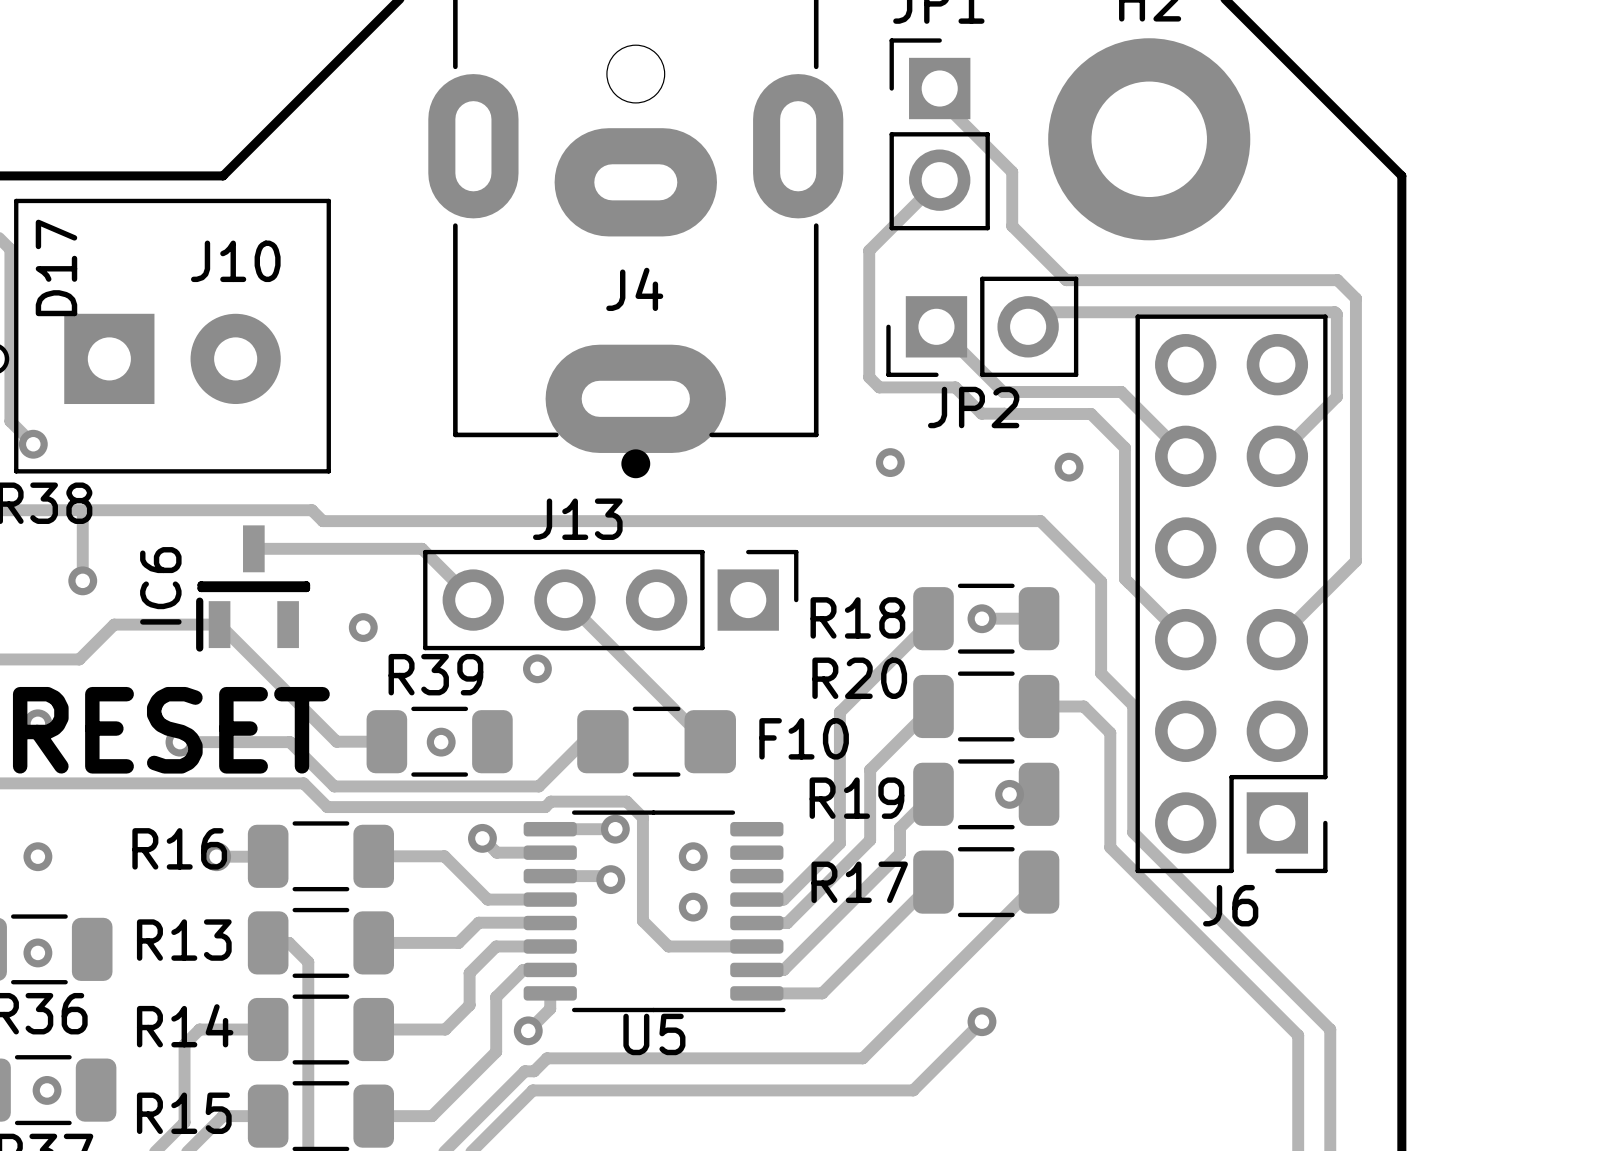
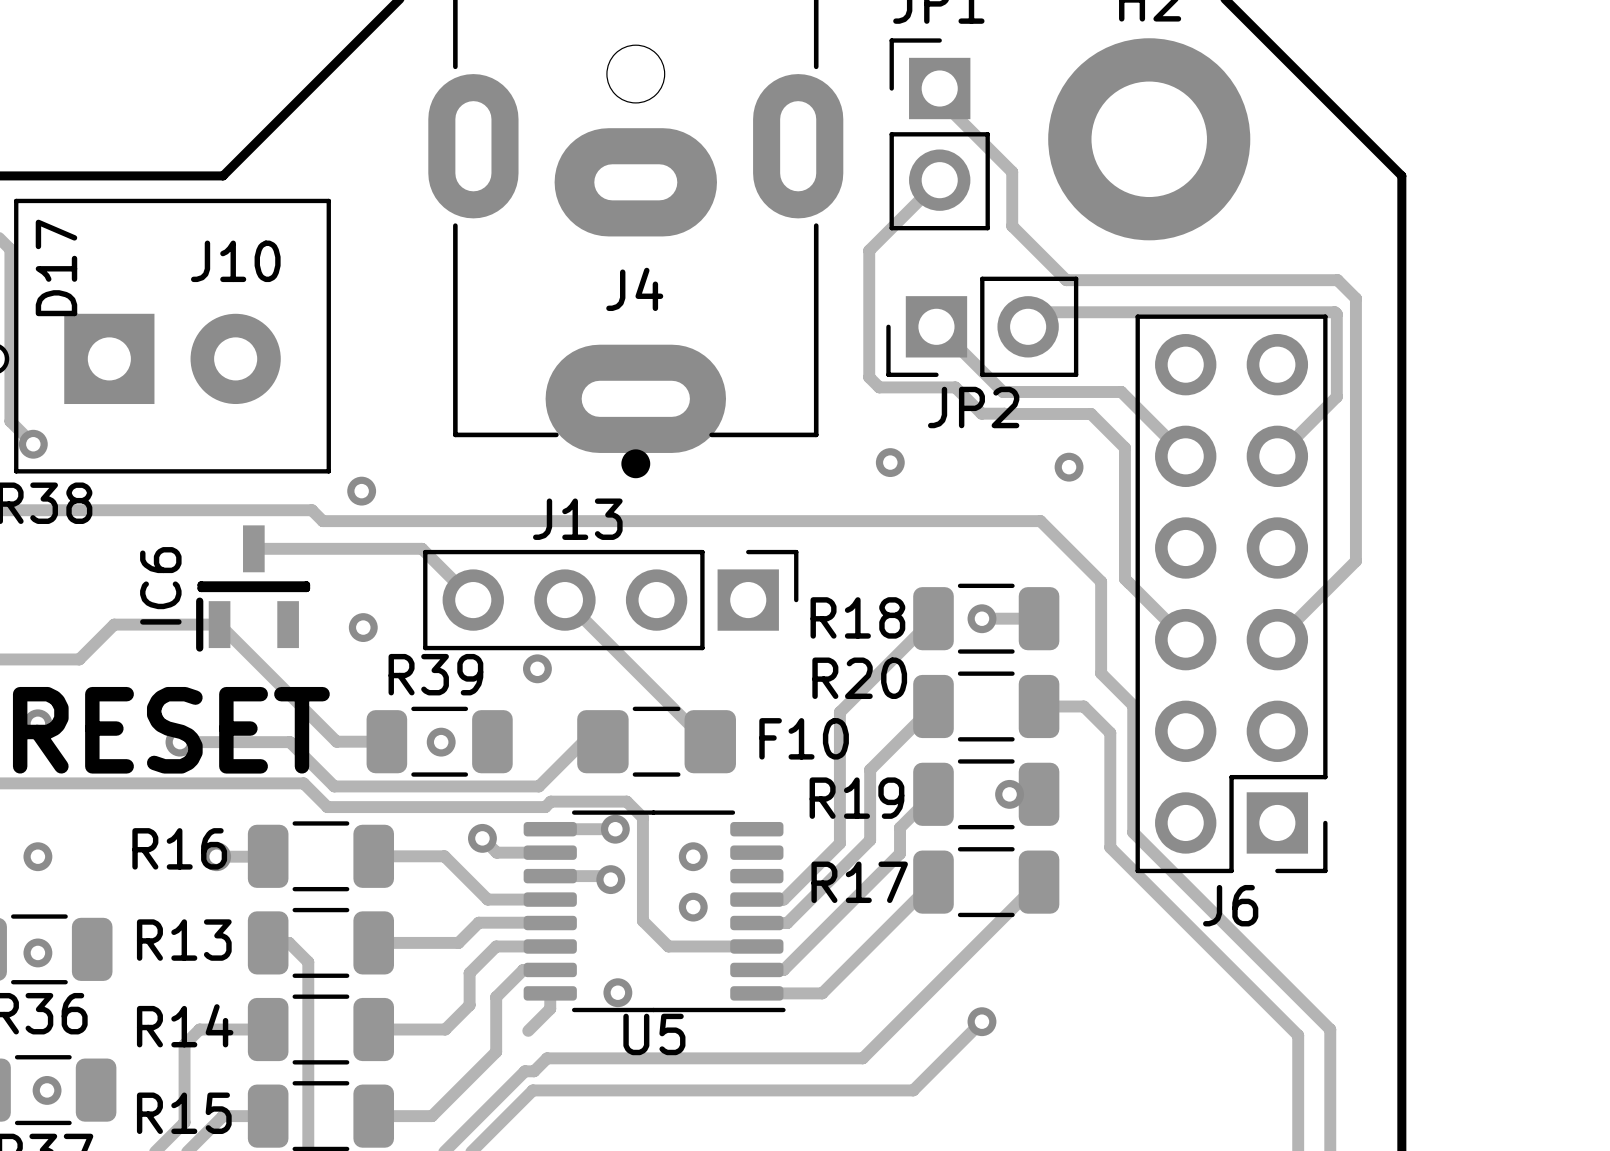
via: none -> (361, 491)
track: (86, 510) (82, 513) (82, 580) -> none
via: (82, 580) -> none
via position: (528, 1030) -> (617, 992)

